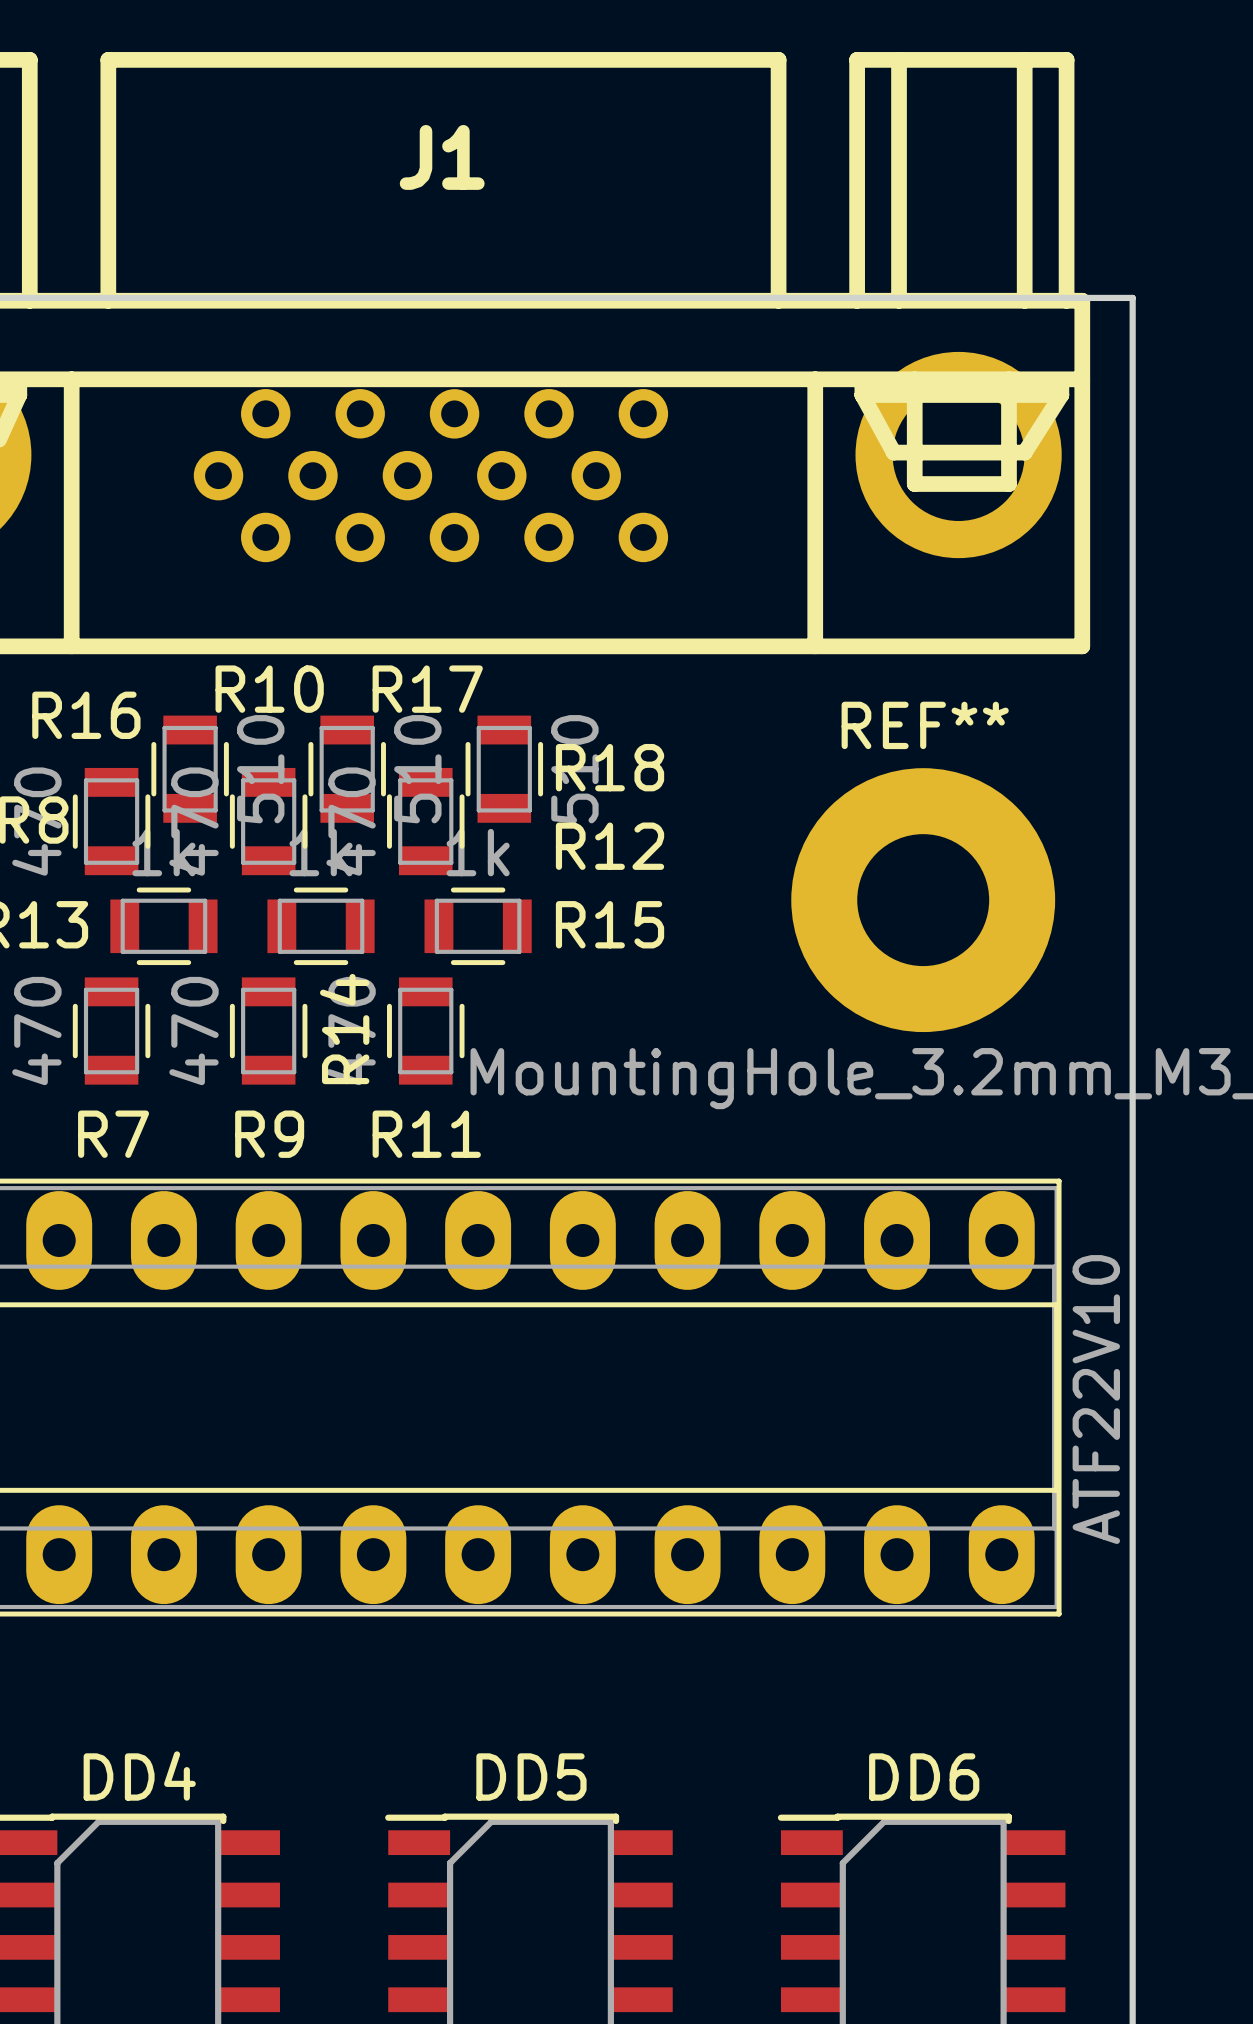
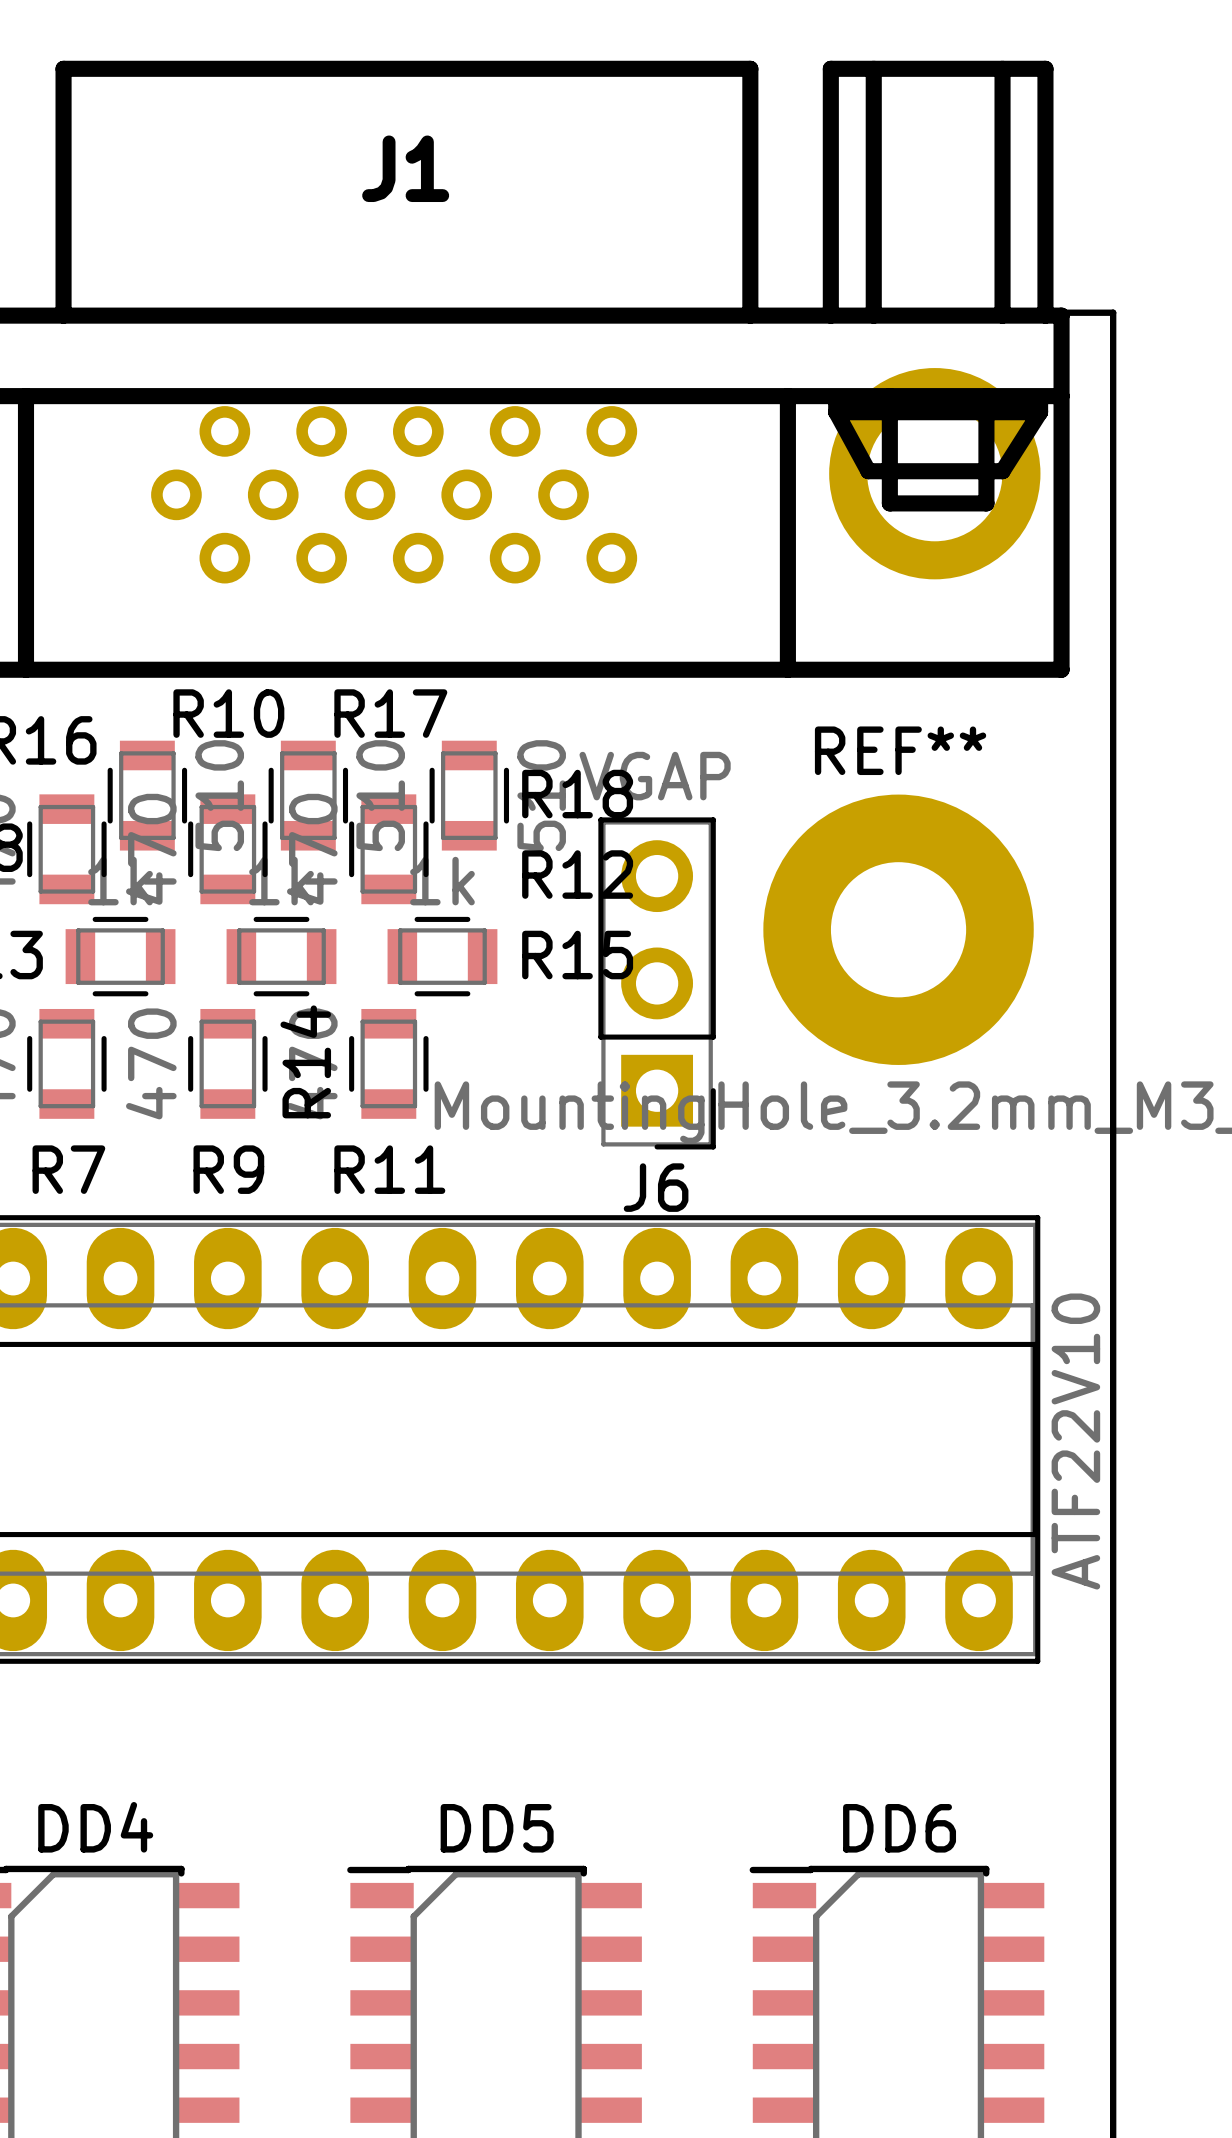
J6: none -> VGAP (657, 983)

